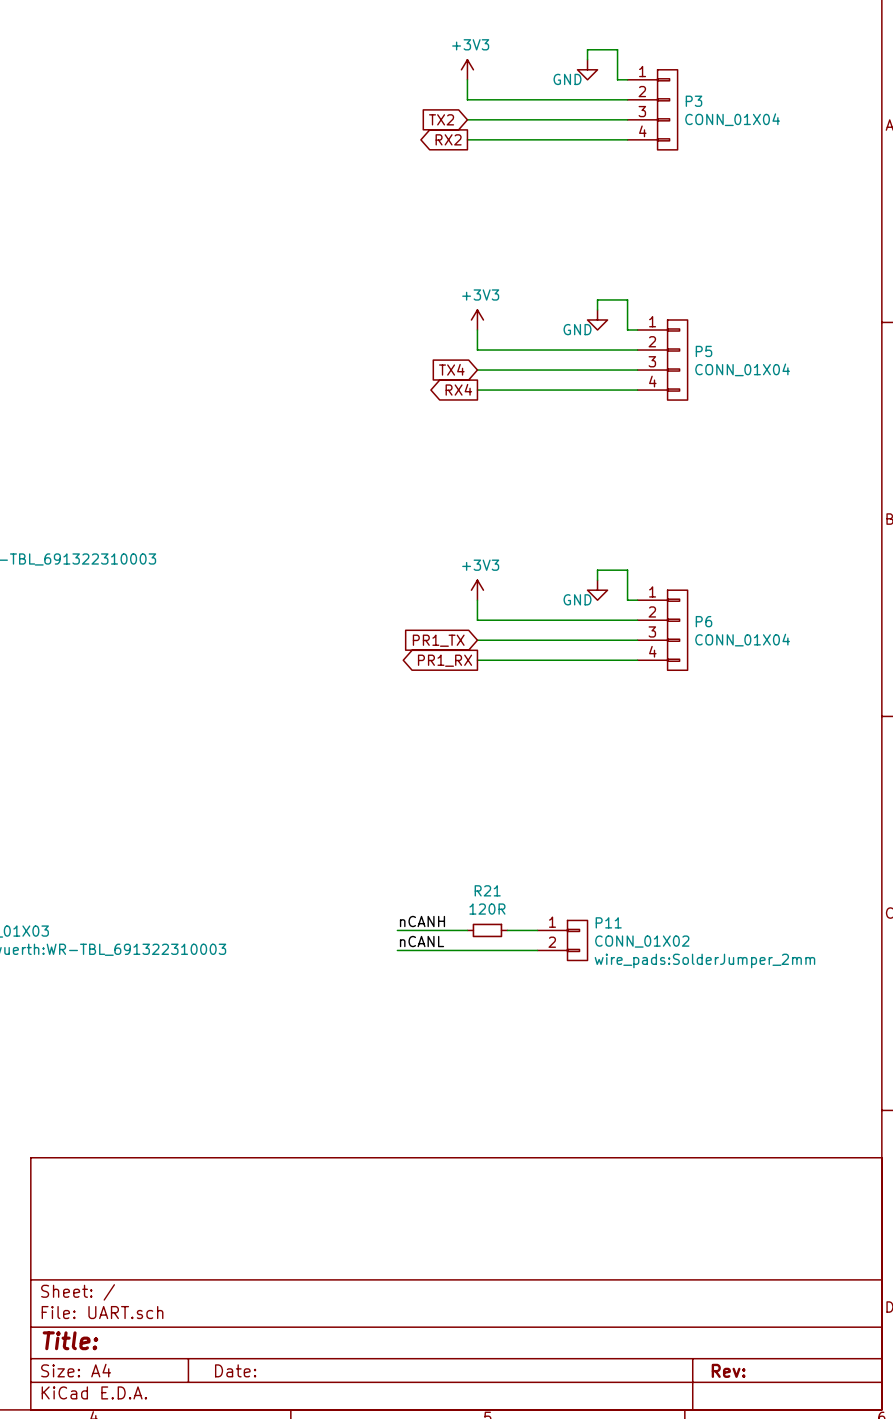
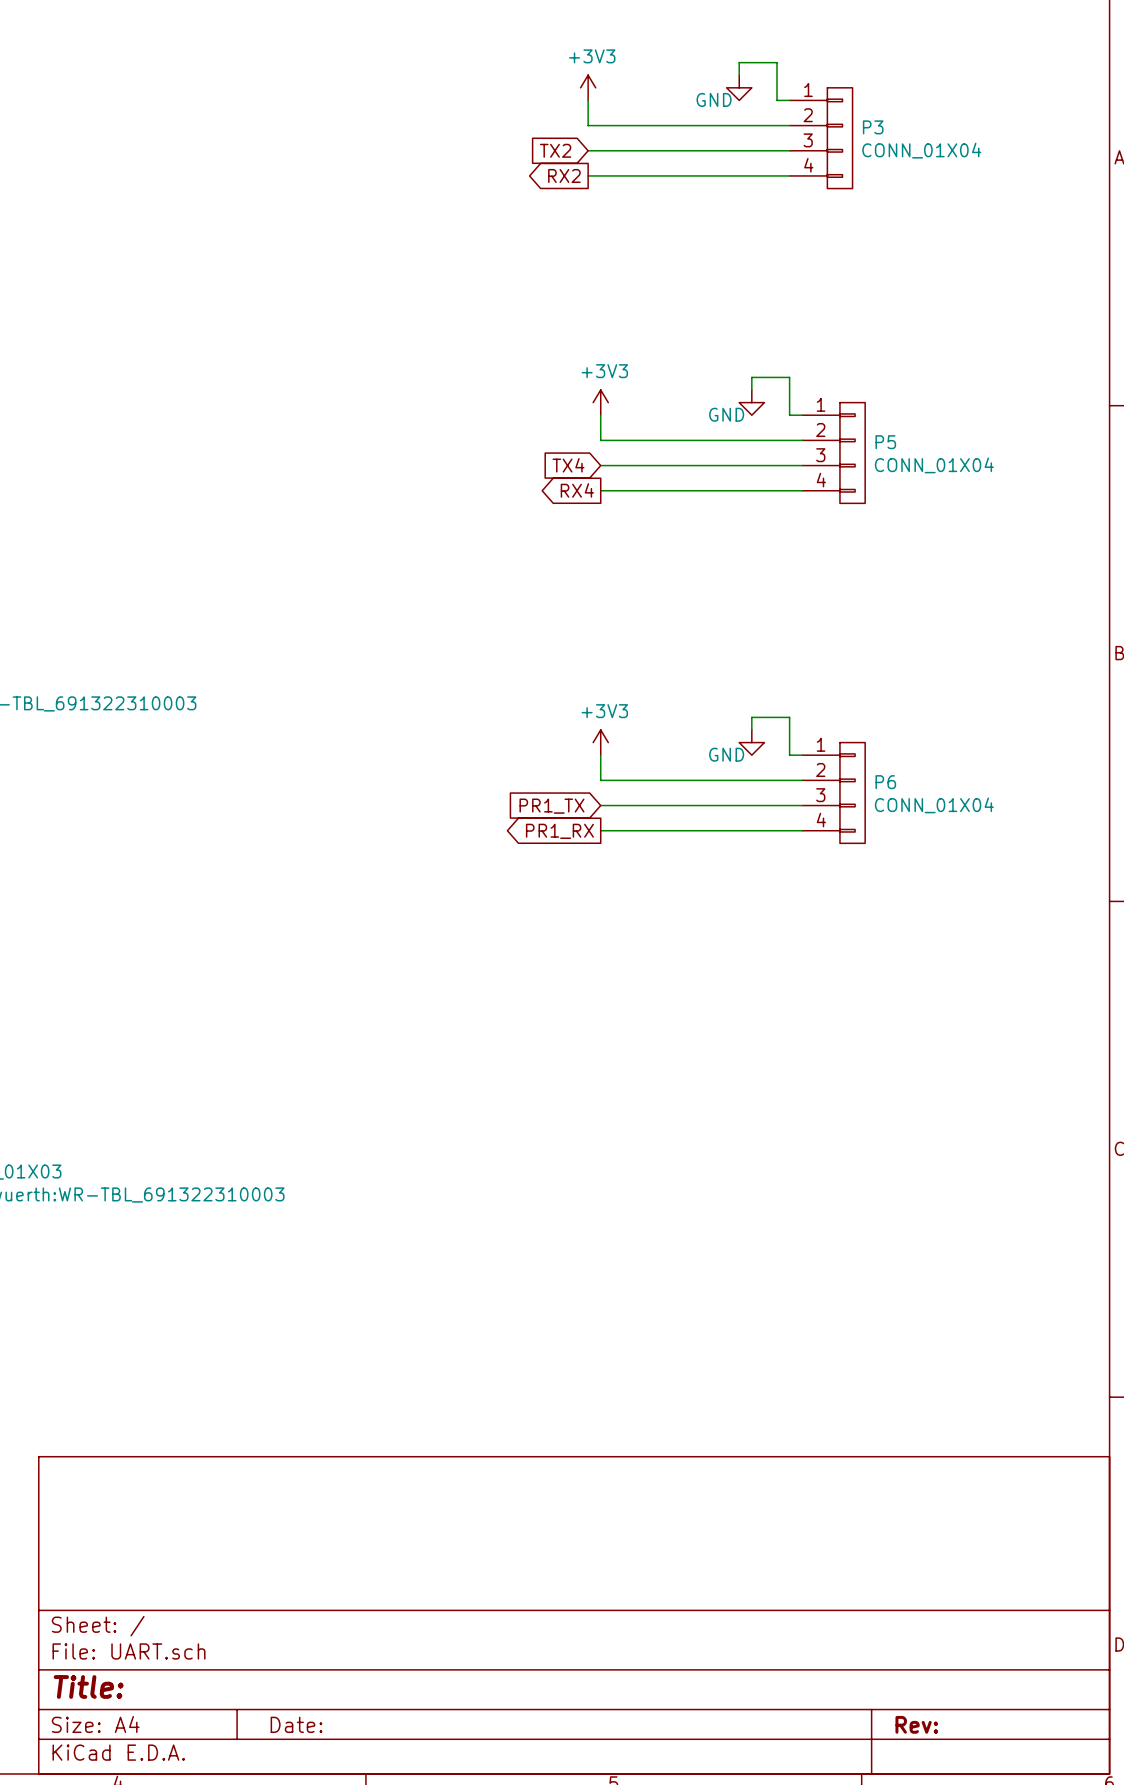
label: nCANH (422, 921) -> none
wire: (397, 930) (467, 930) -> none
R21: 120R (487, 930) -> none
wire: (507, 930) (537, 930) -> none
P11: CONN_01X02 (562, 940) -> none
label: nCANL (422, 941) -> none
wire: (397, 950) (537, 950) -> none

